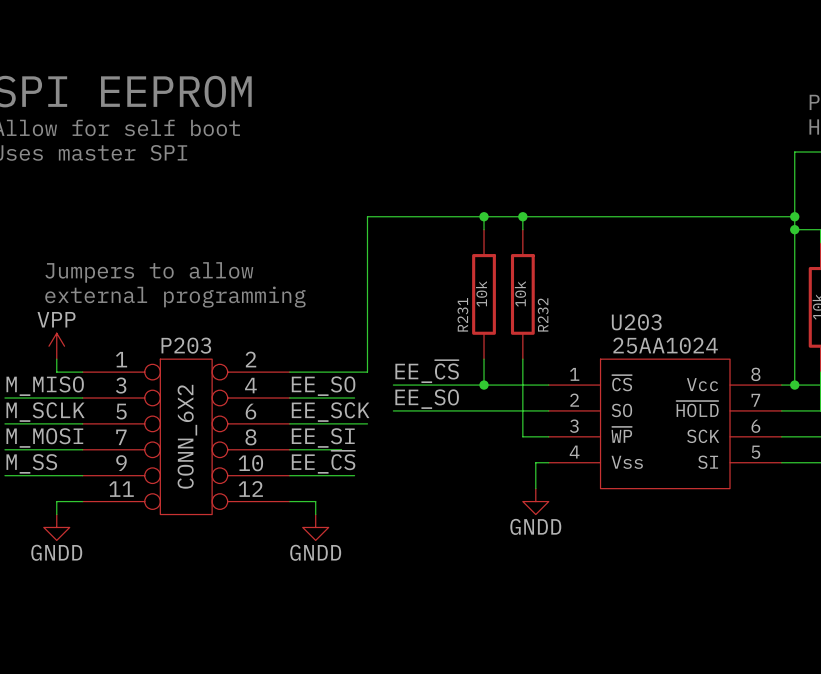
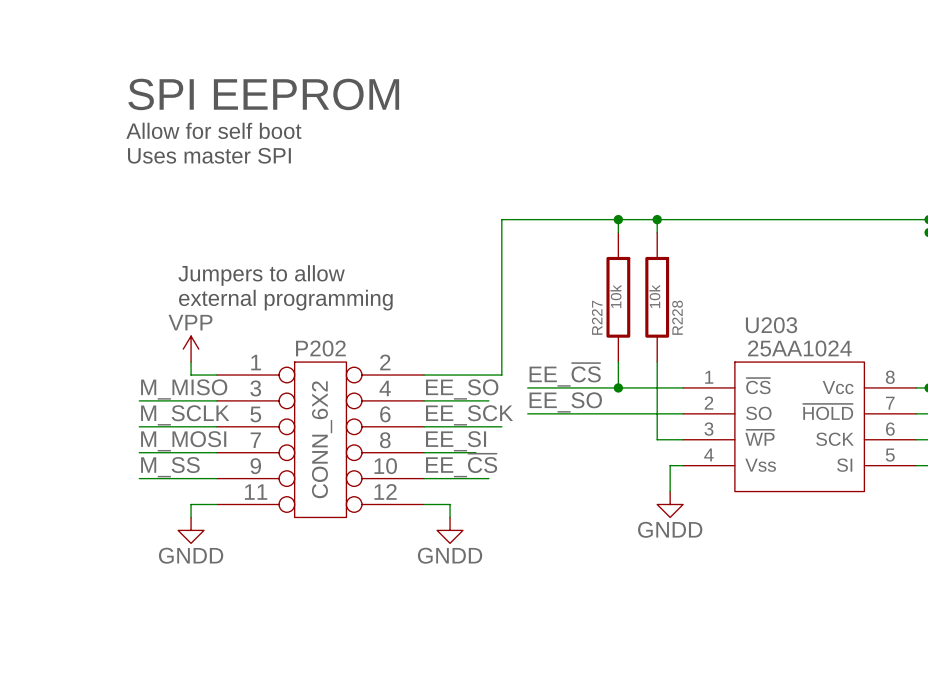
R231 name: R231 (462, 314) -> R227 (597, 317)
R232 name: R232 (543, 314) -> R228 (677, 317)
P203 name: P203 (186, 345) -> P202 (320, 348)

